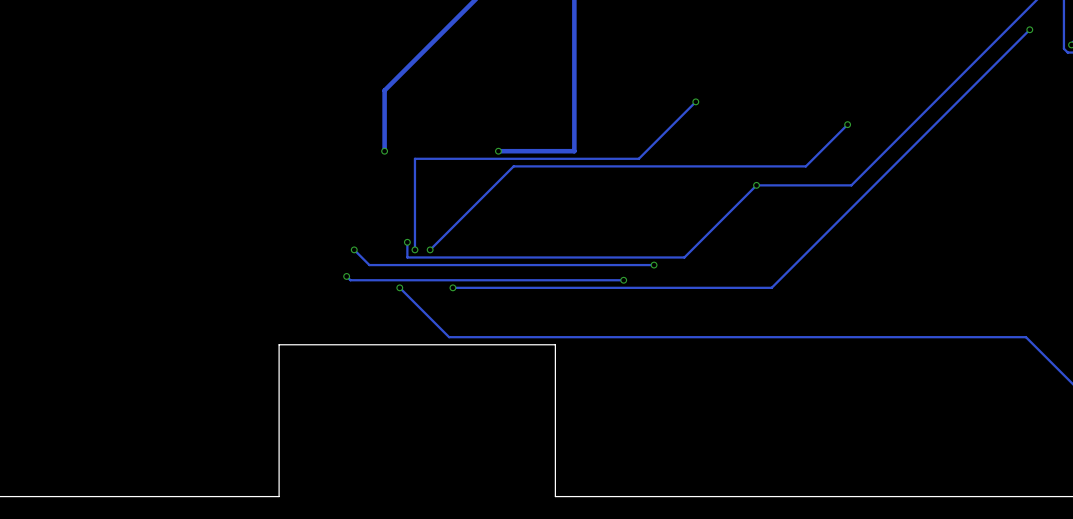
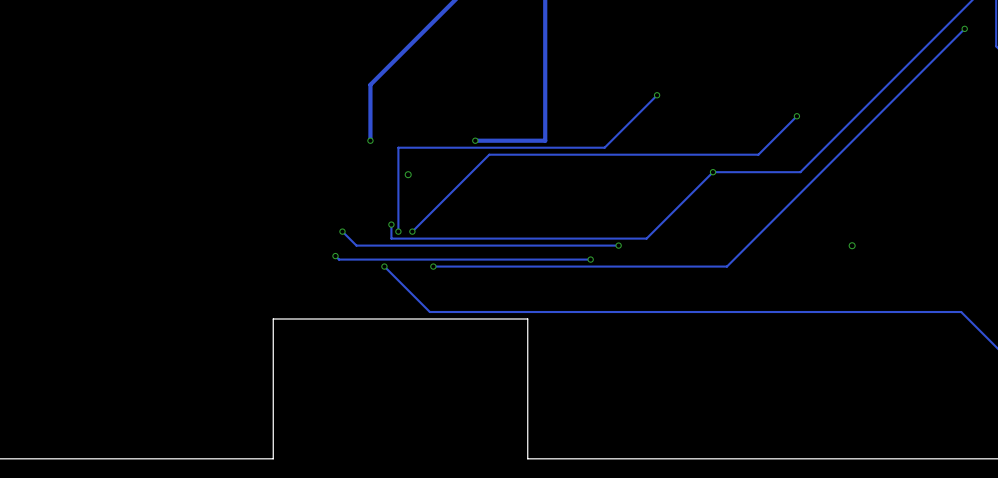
via: none -> (408, 174)
via: none -> (852, 245)

